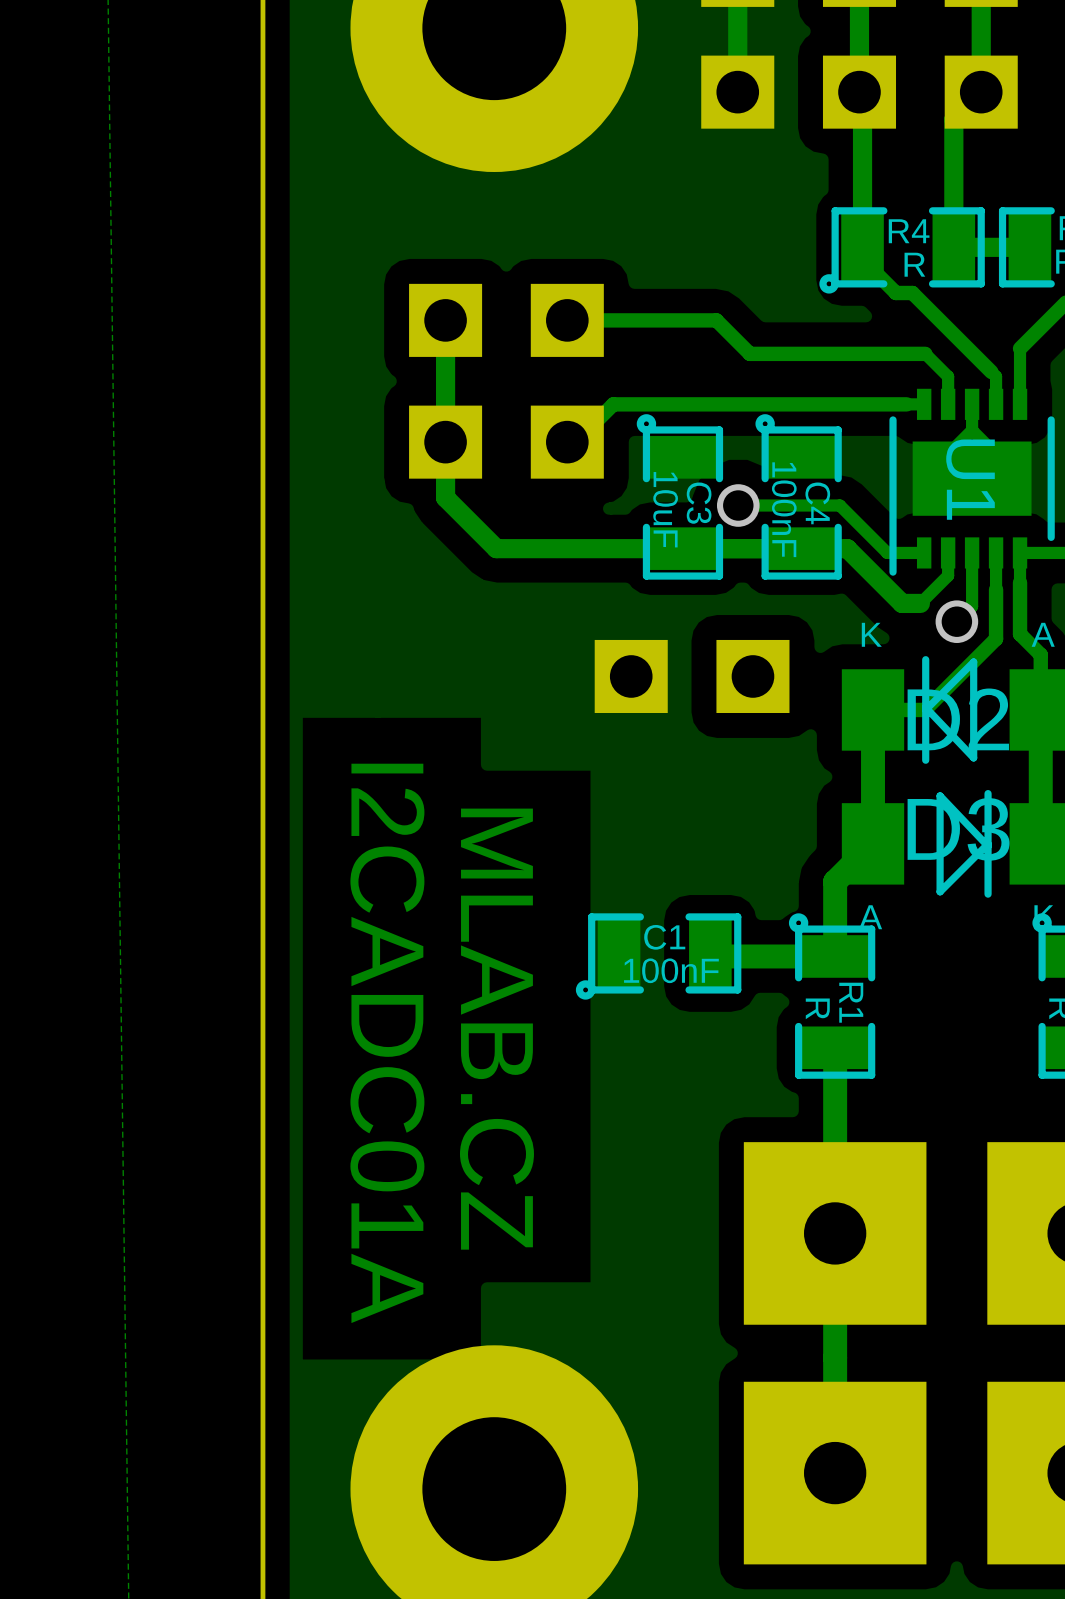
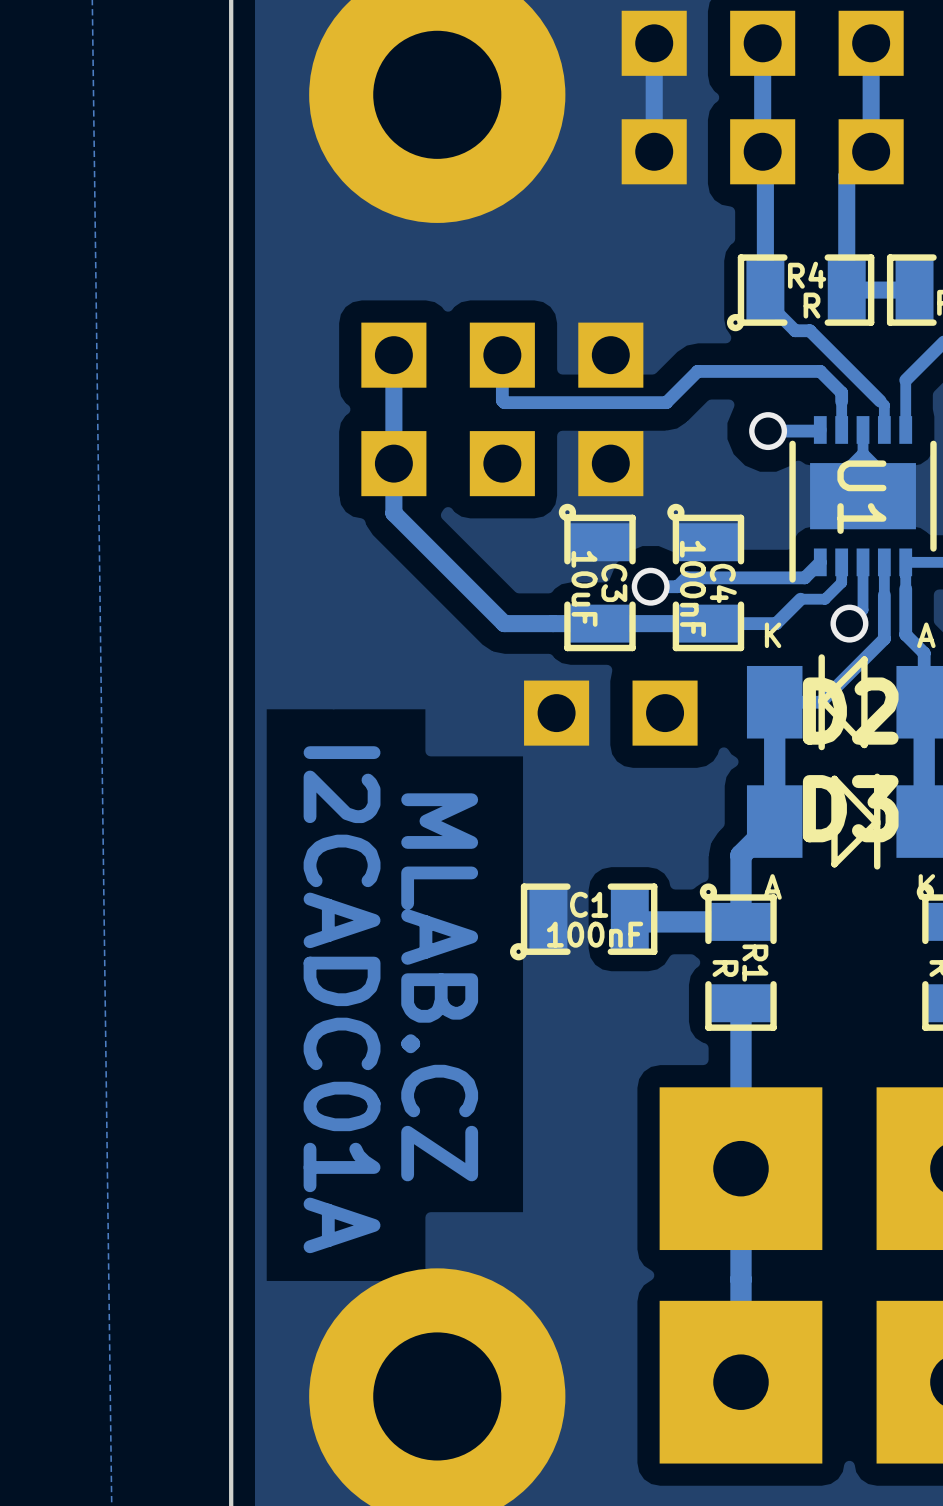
track: (567, 320) (716, 320) (749, 353) (925, 353) (948, 376) -> (502, 355) (502, 400) (504, 402) (666, 402) (697, 371) (820, 371) (841, 392) (841, 405)
part: none -> (610, 409)
track: (924, 404) (613, 404) (575, 442) -> (820, 429) (768, 431)
via: none -> (768, 431)
C3 position: (679, 496) -> (597, 577)
C4 position: (798, 496) -> (705, 577)
track: (738, 505) (839, 505) (887, 552) (924, 552) -> (650, 586) (677, 586) (686, 577) (804, 577) (820, 562)
via position: (738, 505) -> (650, 586)
track: (496, 548) (847, 548) (902, 603) (920, 603) (929, 594) -> (439, 558) (504, 623) (776, 623) (800, 599) (825, 599)
part position: (692, 676) -> (610, 713)

